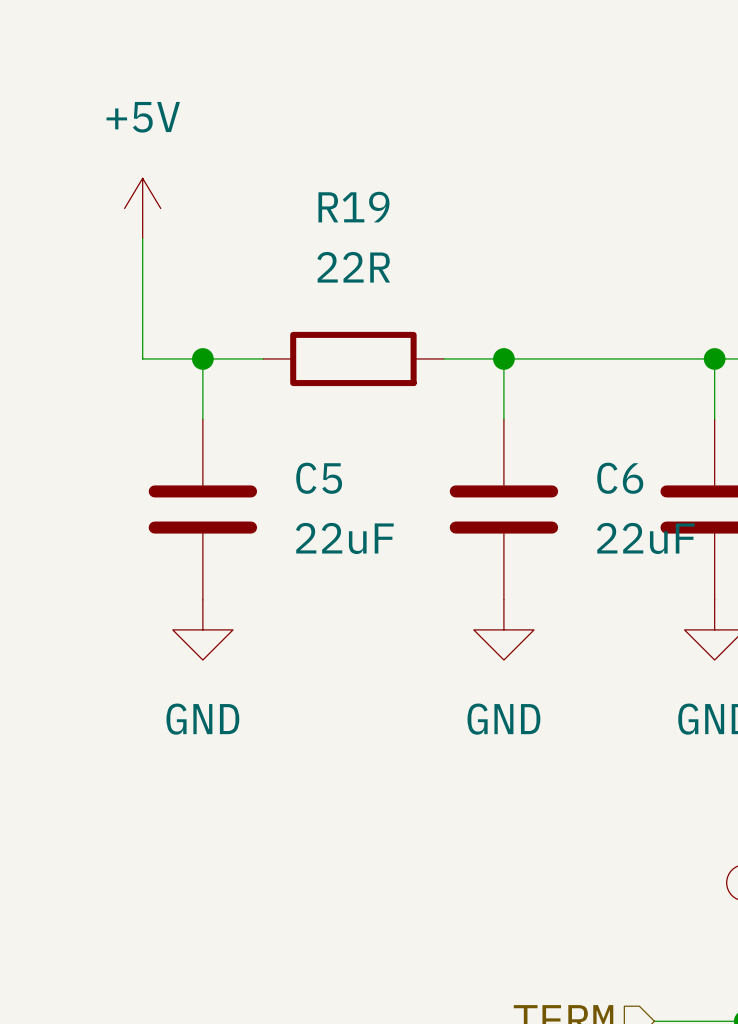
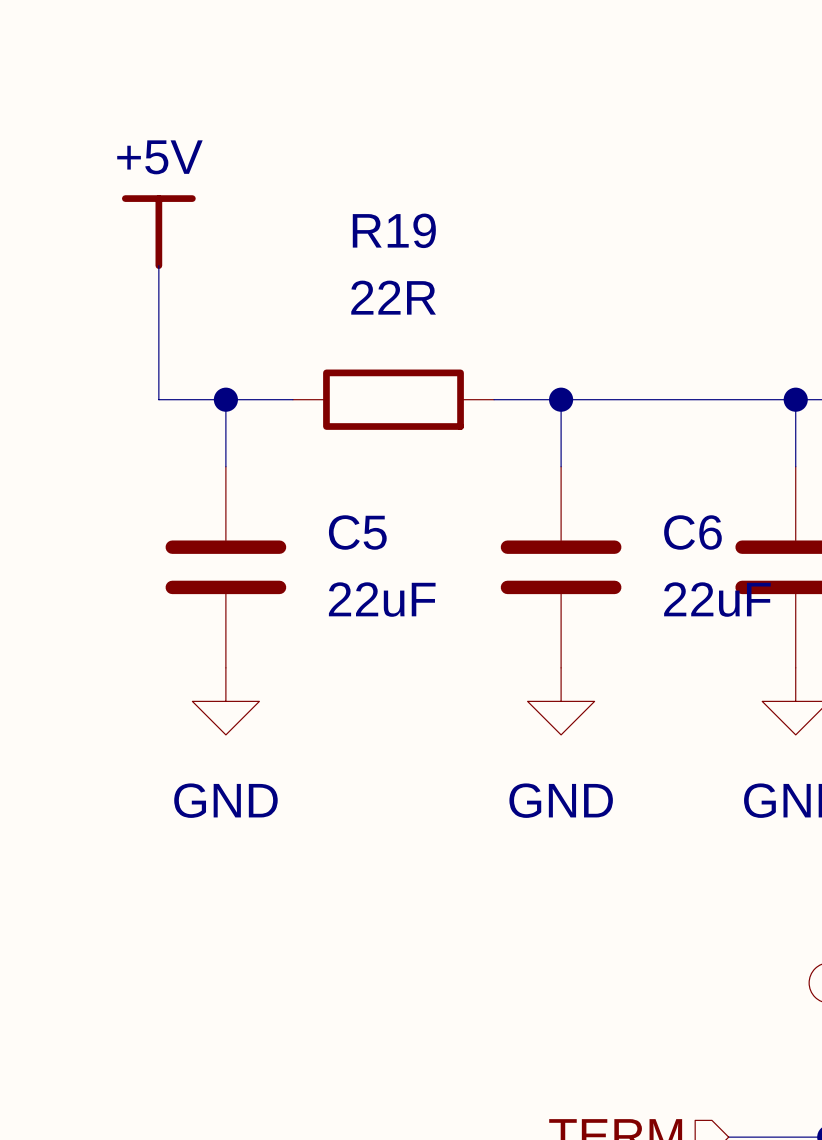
power symbol shape: [124, 178, 161, 239] -> [121, 195, 196, 269]

